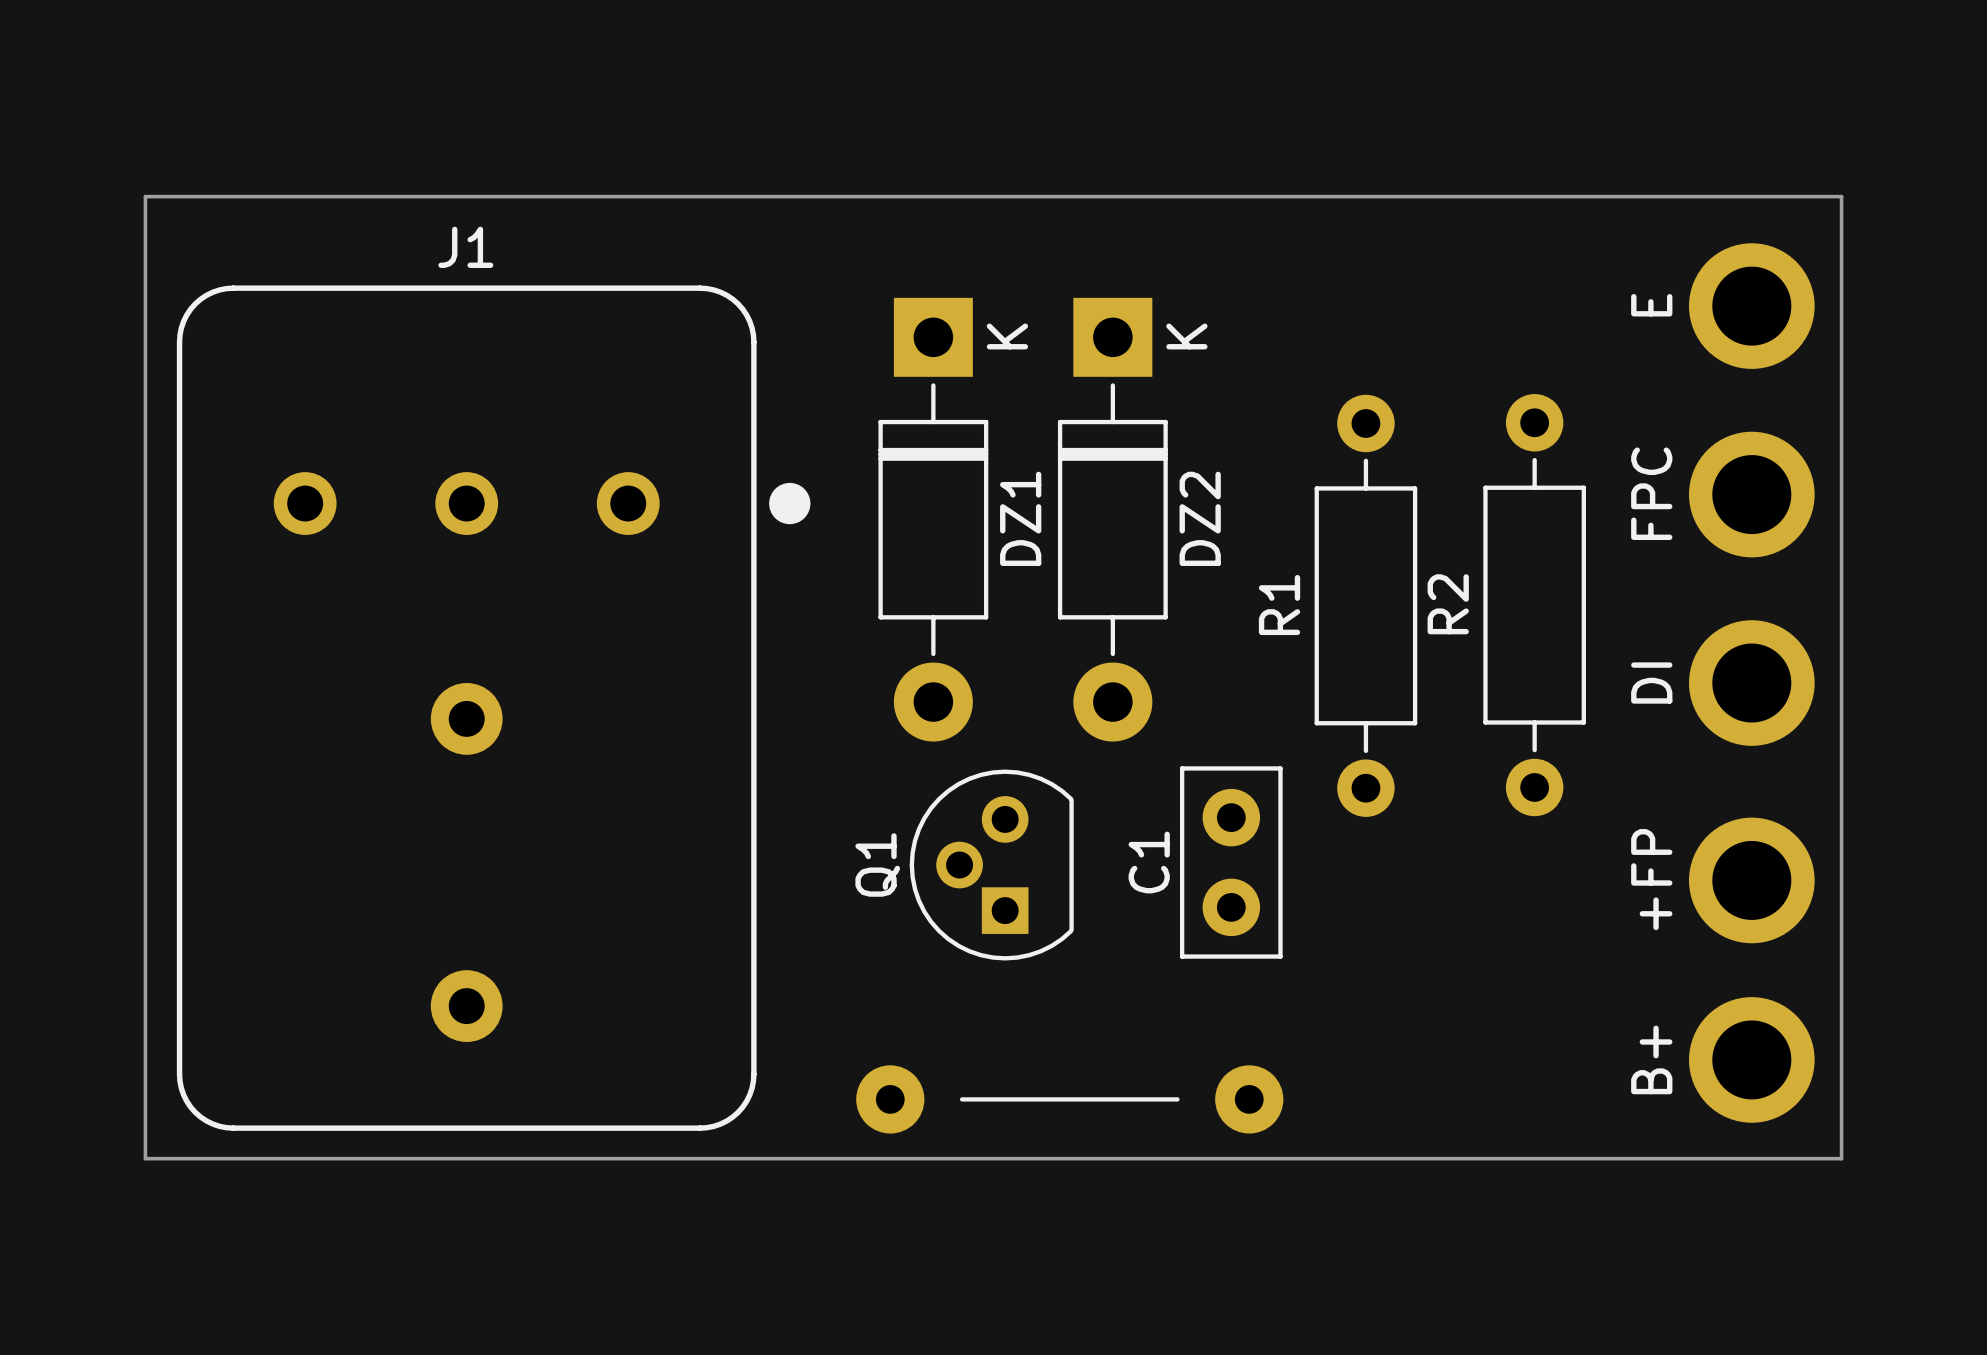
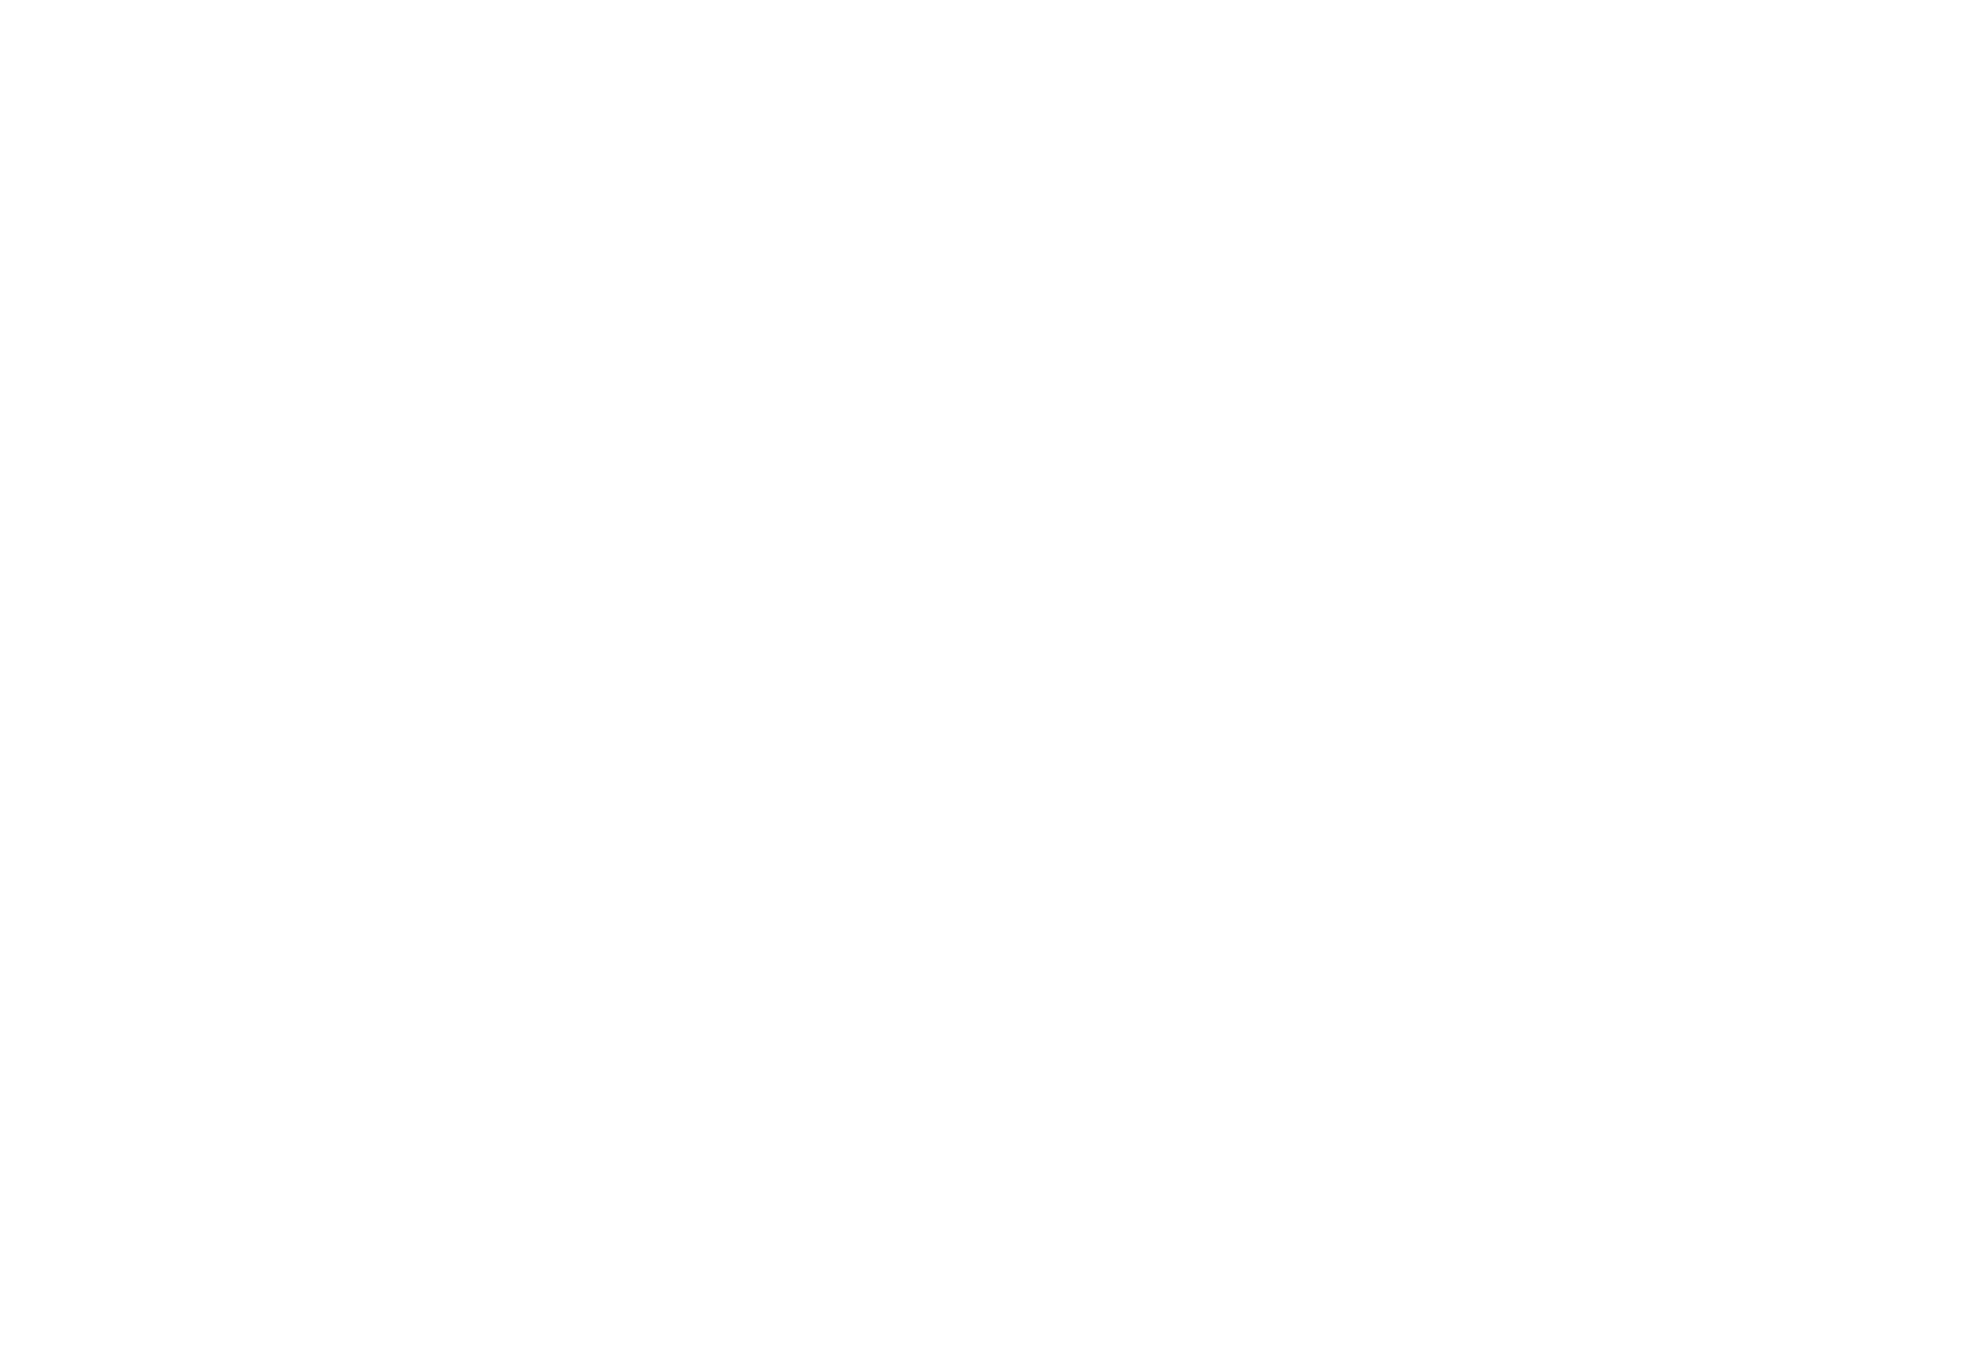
board edge: (145, 196) (1841, 196) (1841, 1158) (145, 1158) (145, 196) -> none
E: (1751, 306) -> none
FPC: (1751, 494) -> none
DZ1: (933, 519) -> none
DZ2: (1112, 519) -> none
R1: (1365, 605) -> none
R2: (1534, 605) -> none
DI: (1751, 683) -> none
J1: (493, 708) -> none
C1: (1231, 862) -> none
Q1: (991, 865) -> none
+FP: (1751, 880) -> none
B+: (1751, 1059) -> none
part: (1069, 1099) -> none

